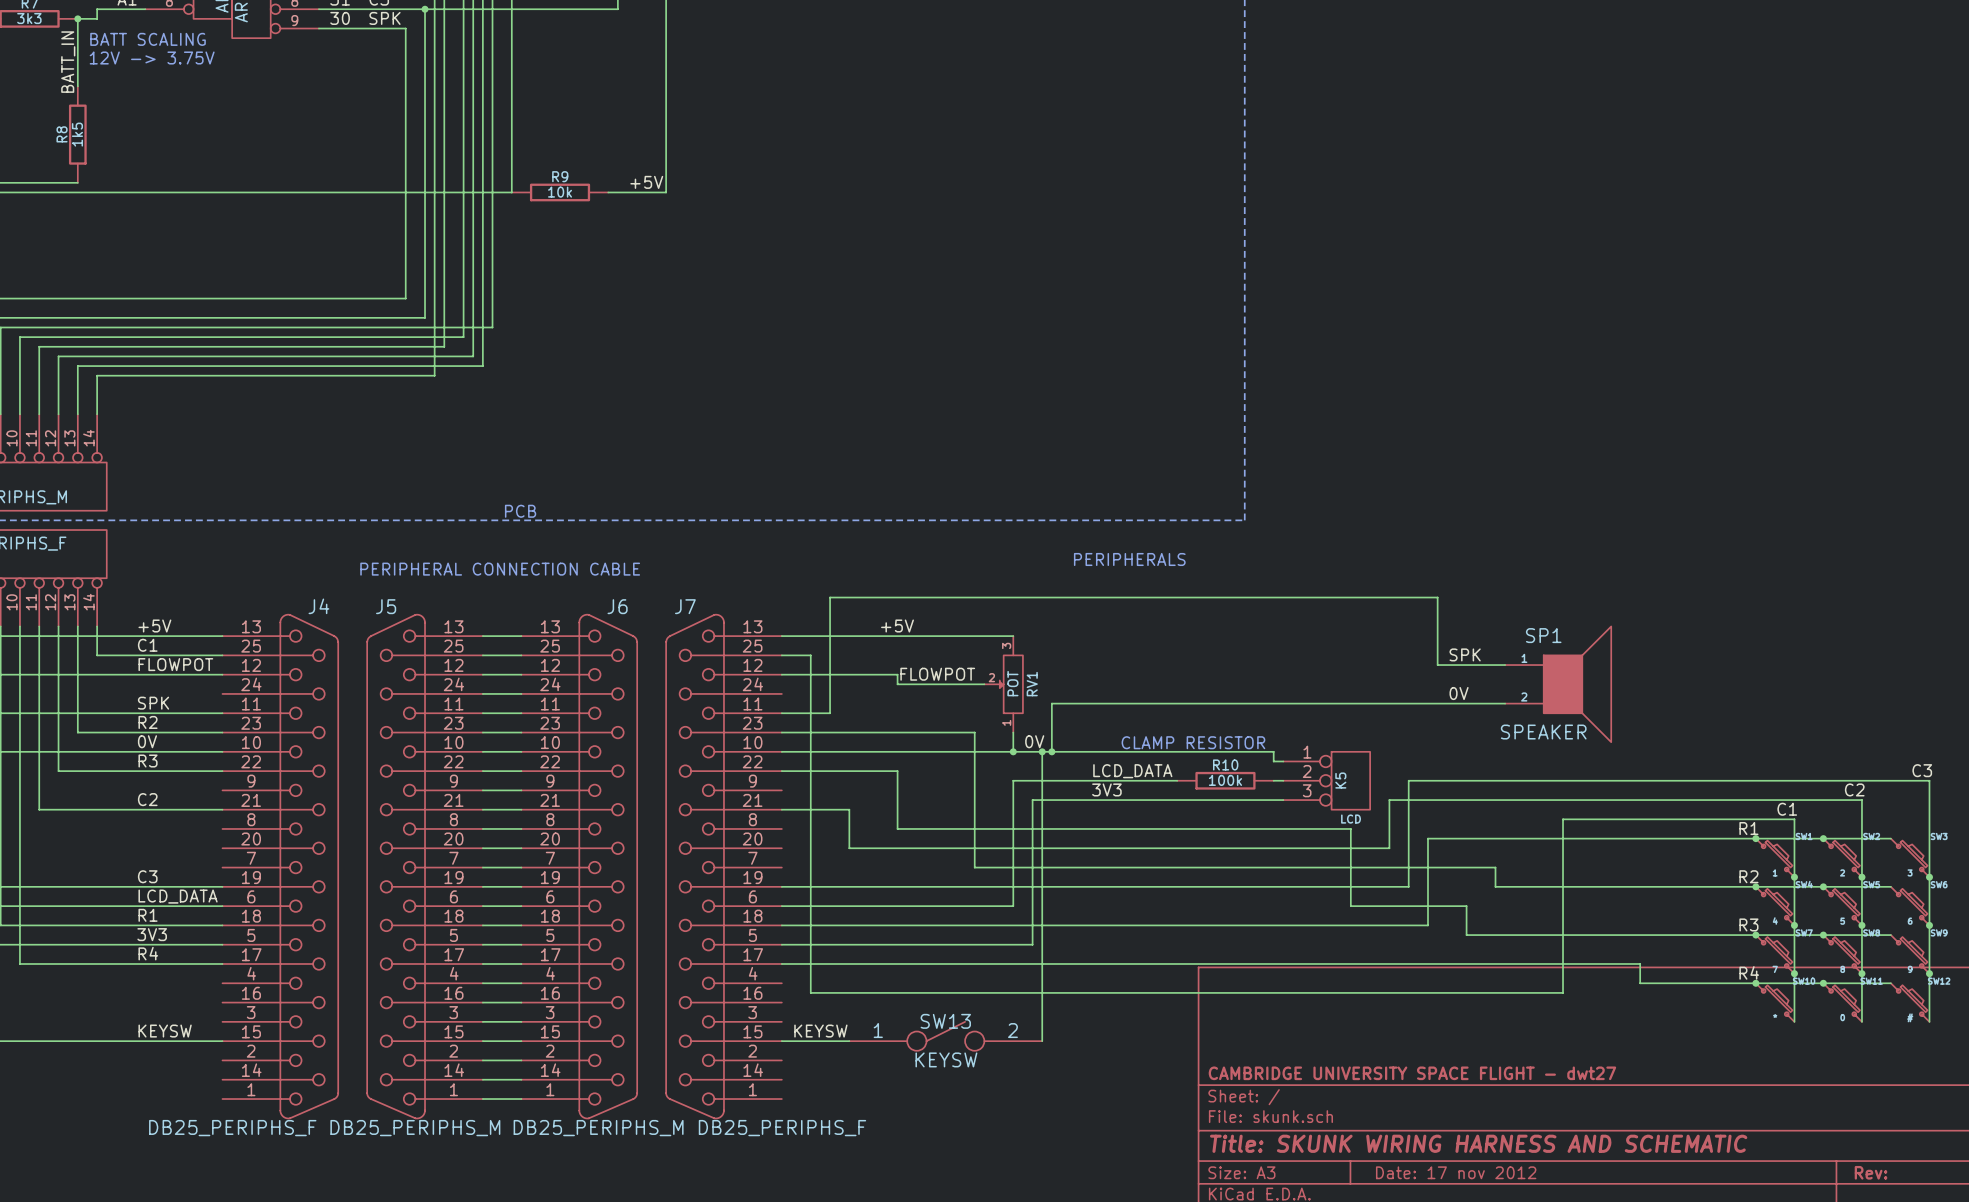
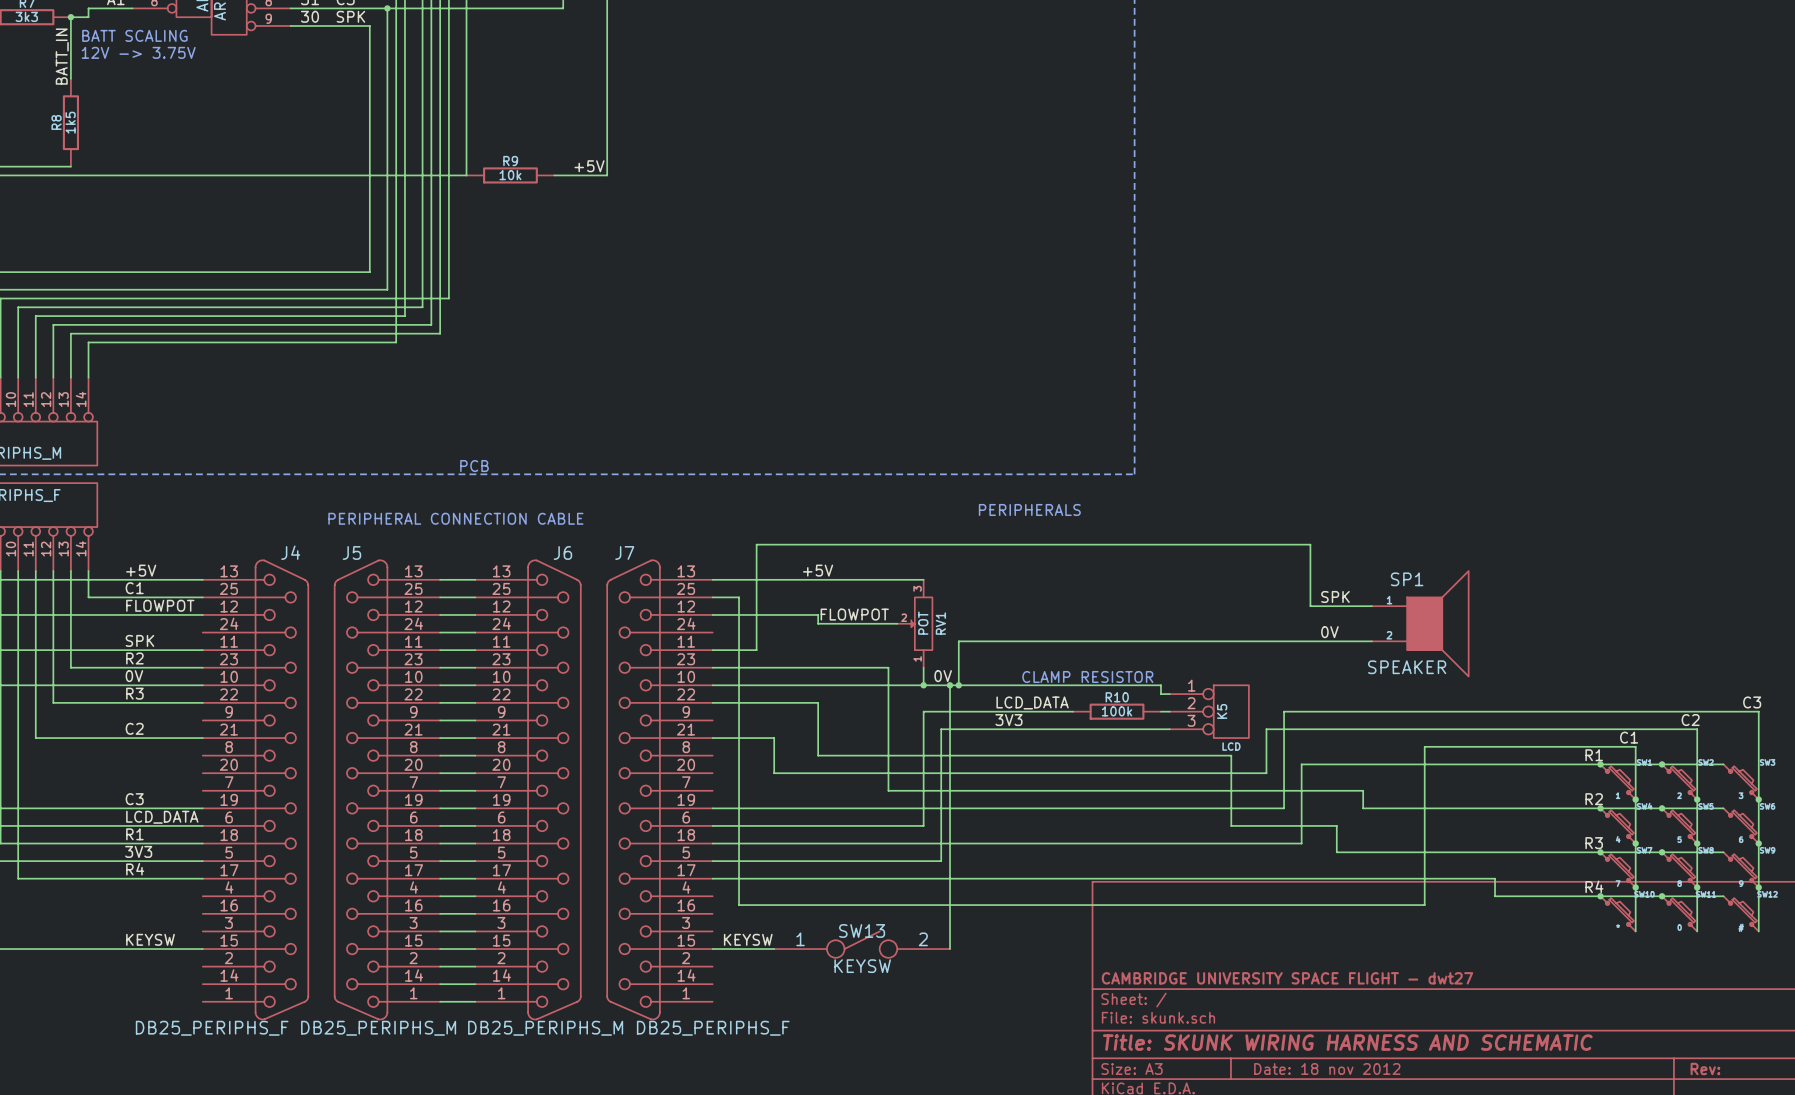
title block: Date: 17 nov 2012 (1456, 1172) -> Date: 18 nov 2012 (1327, 1069)

